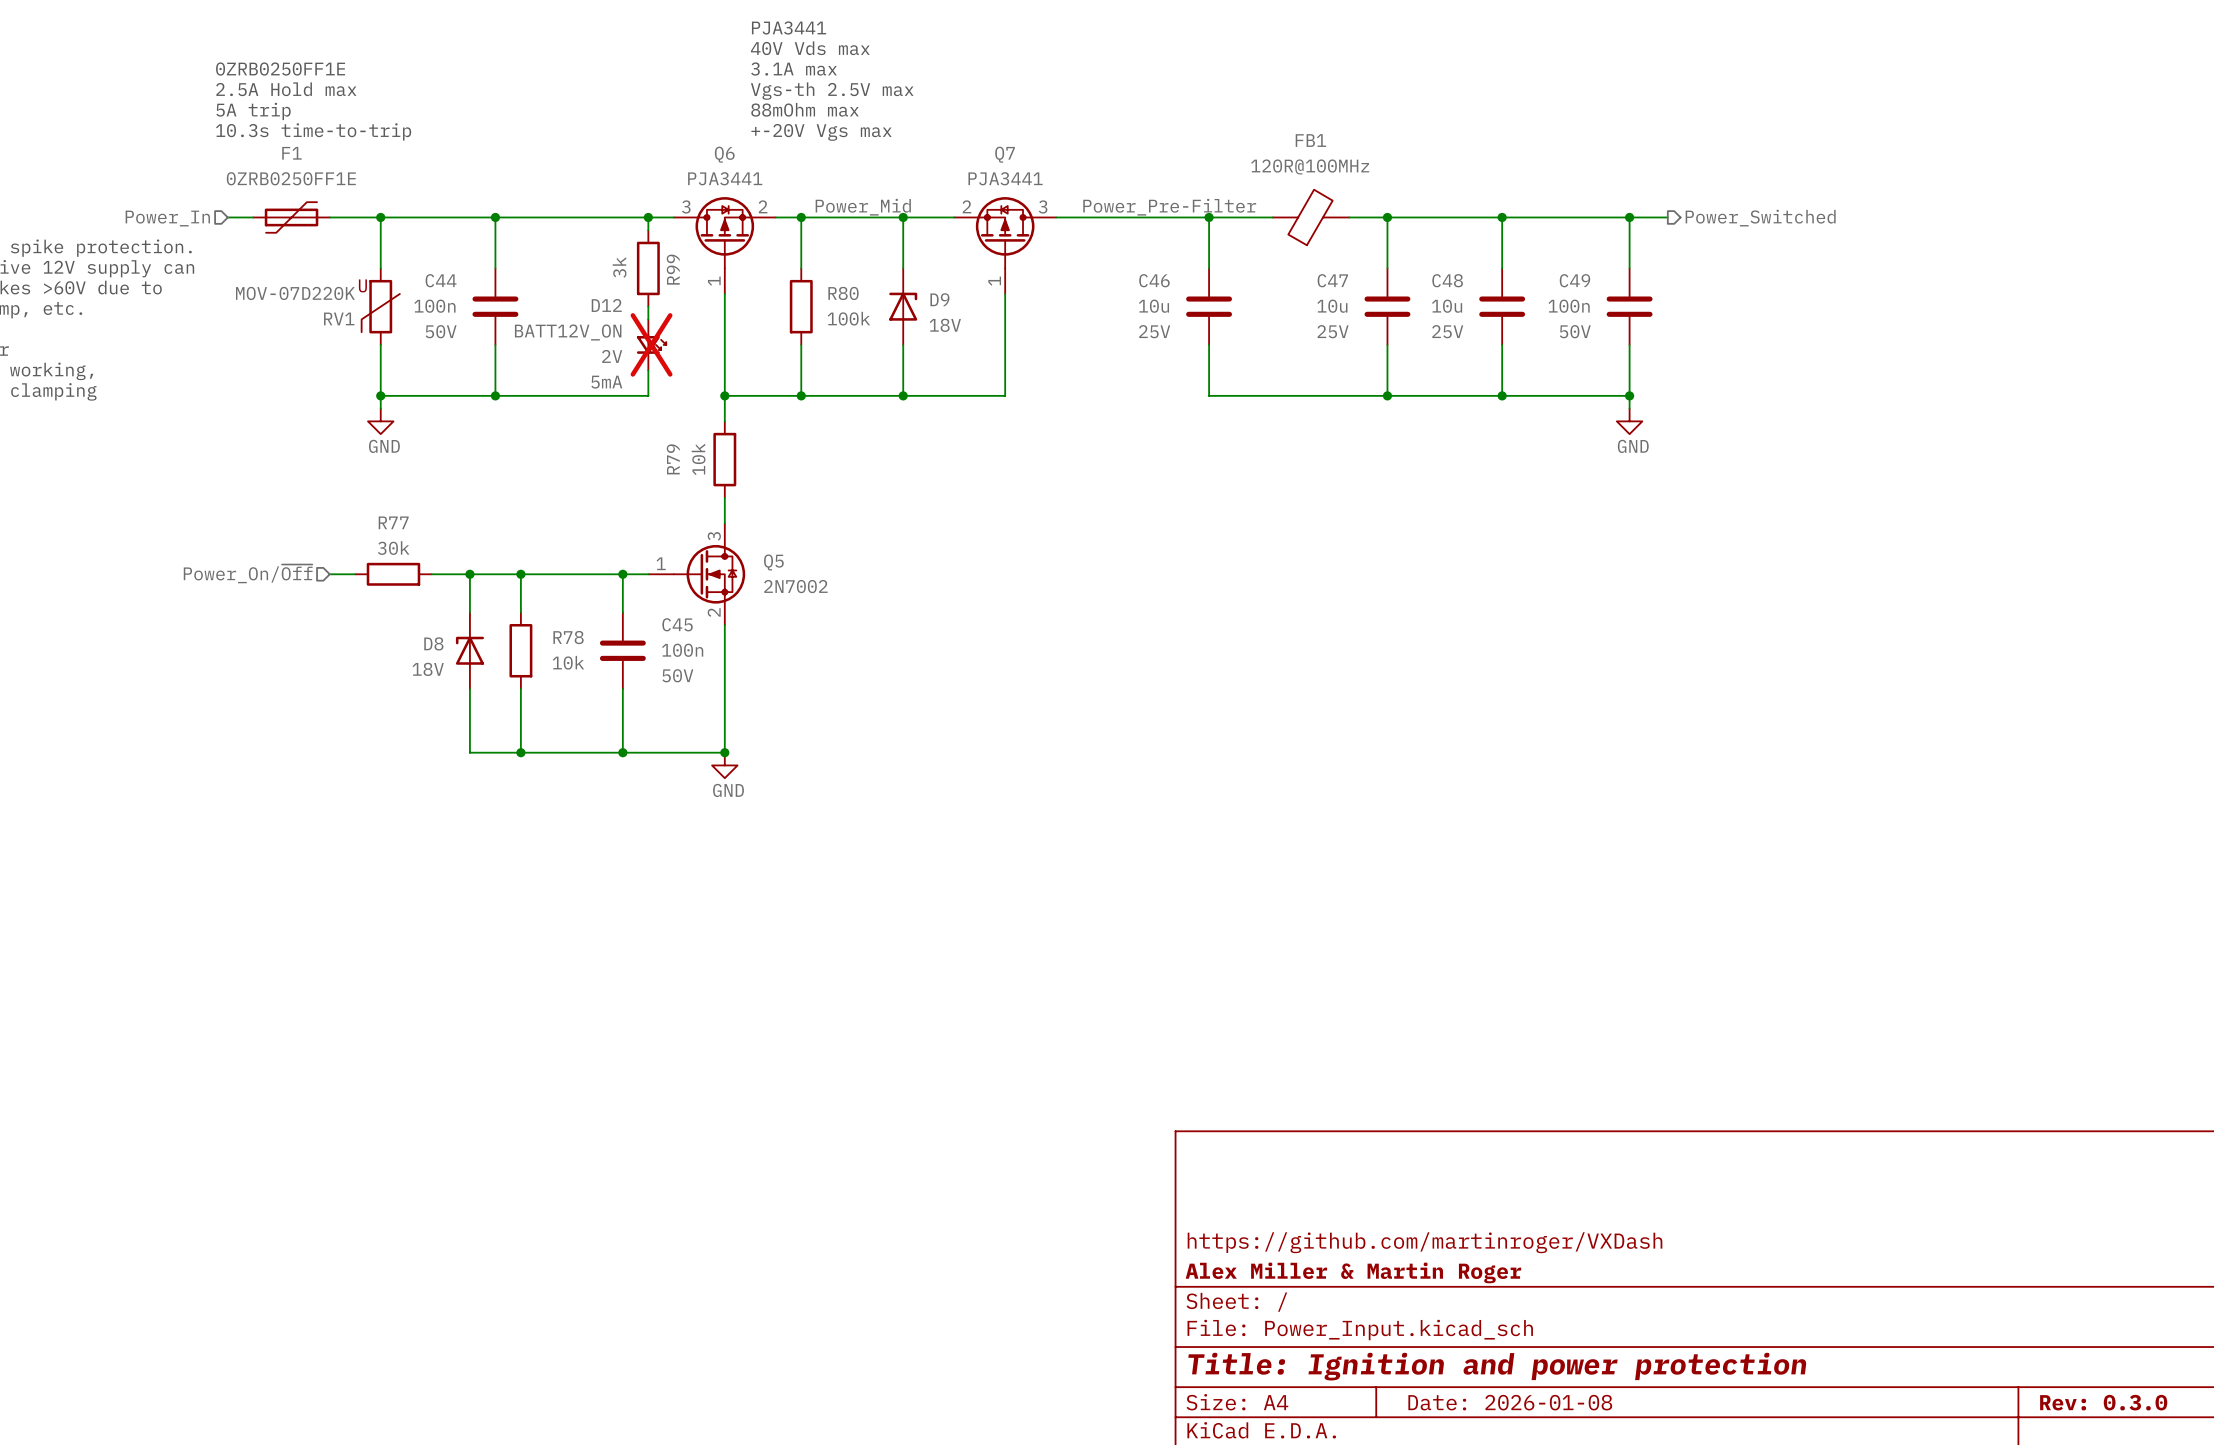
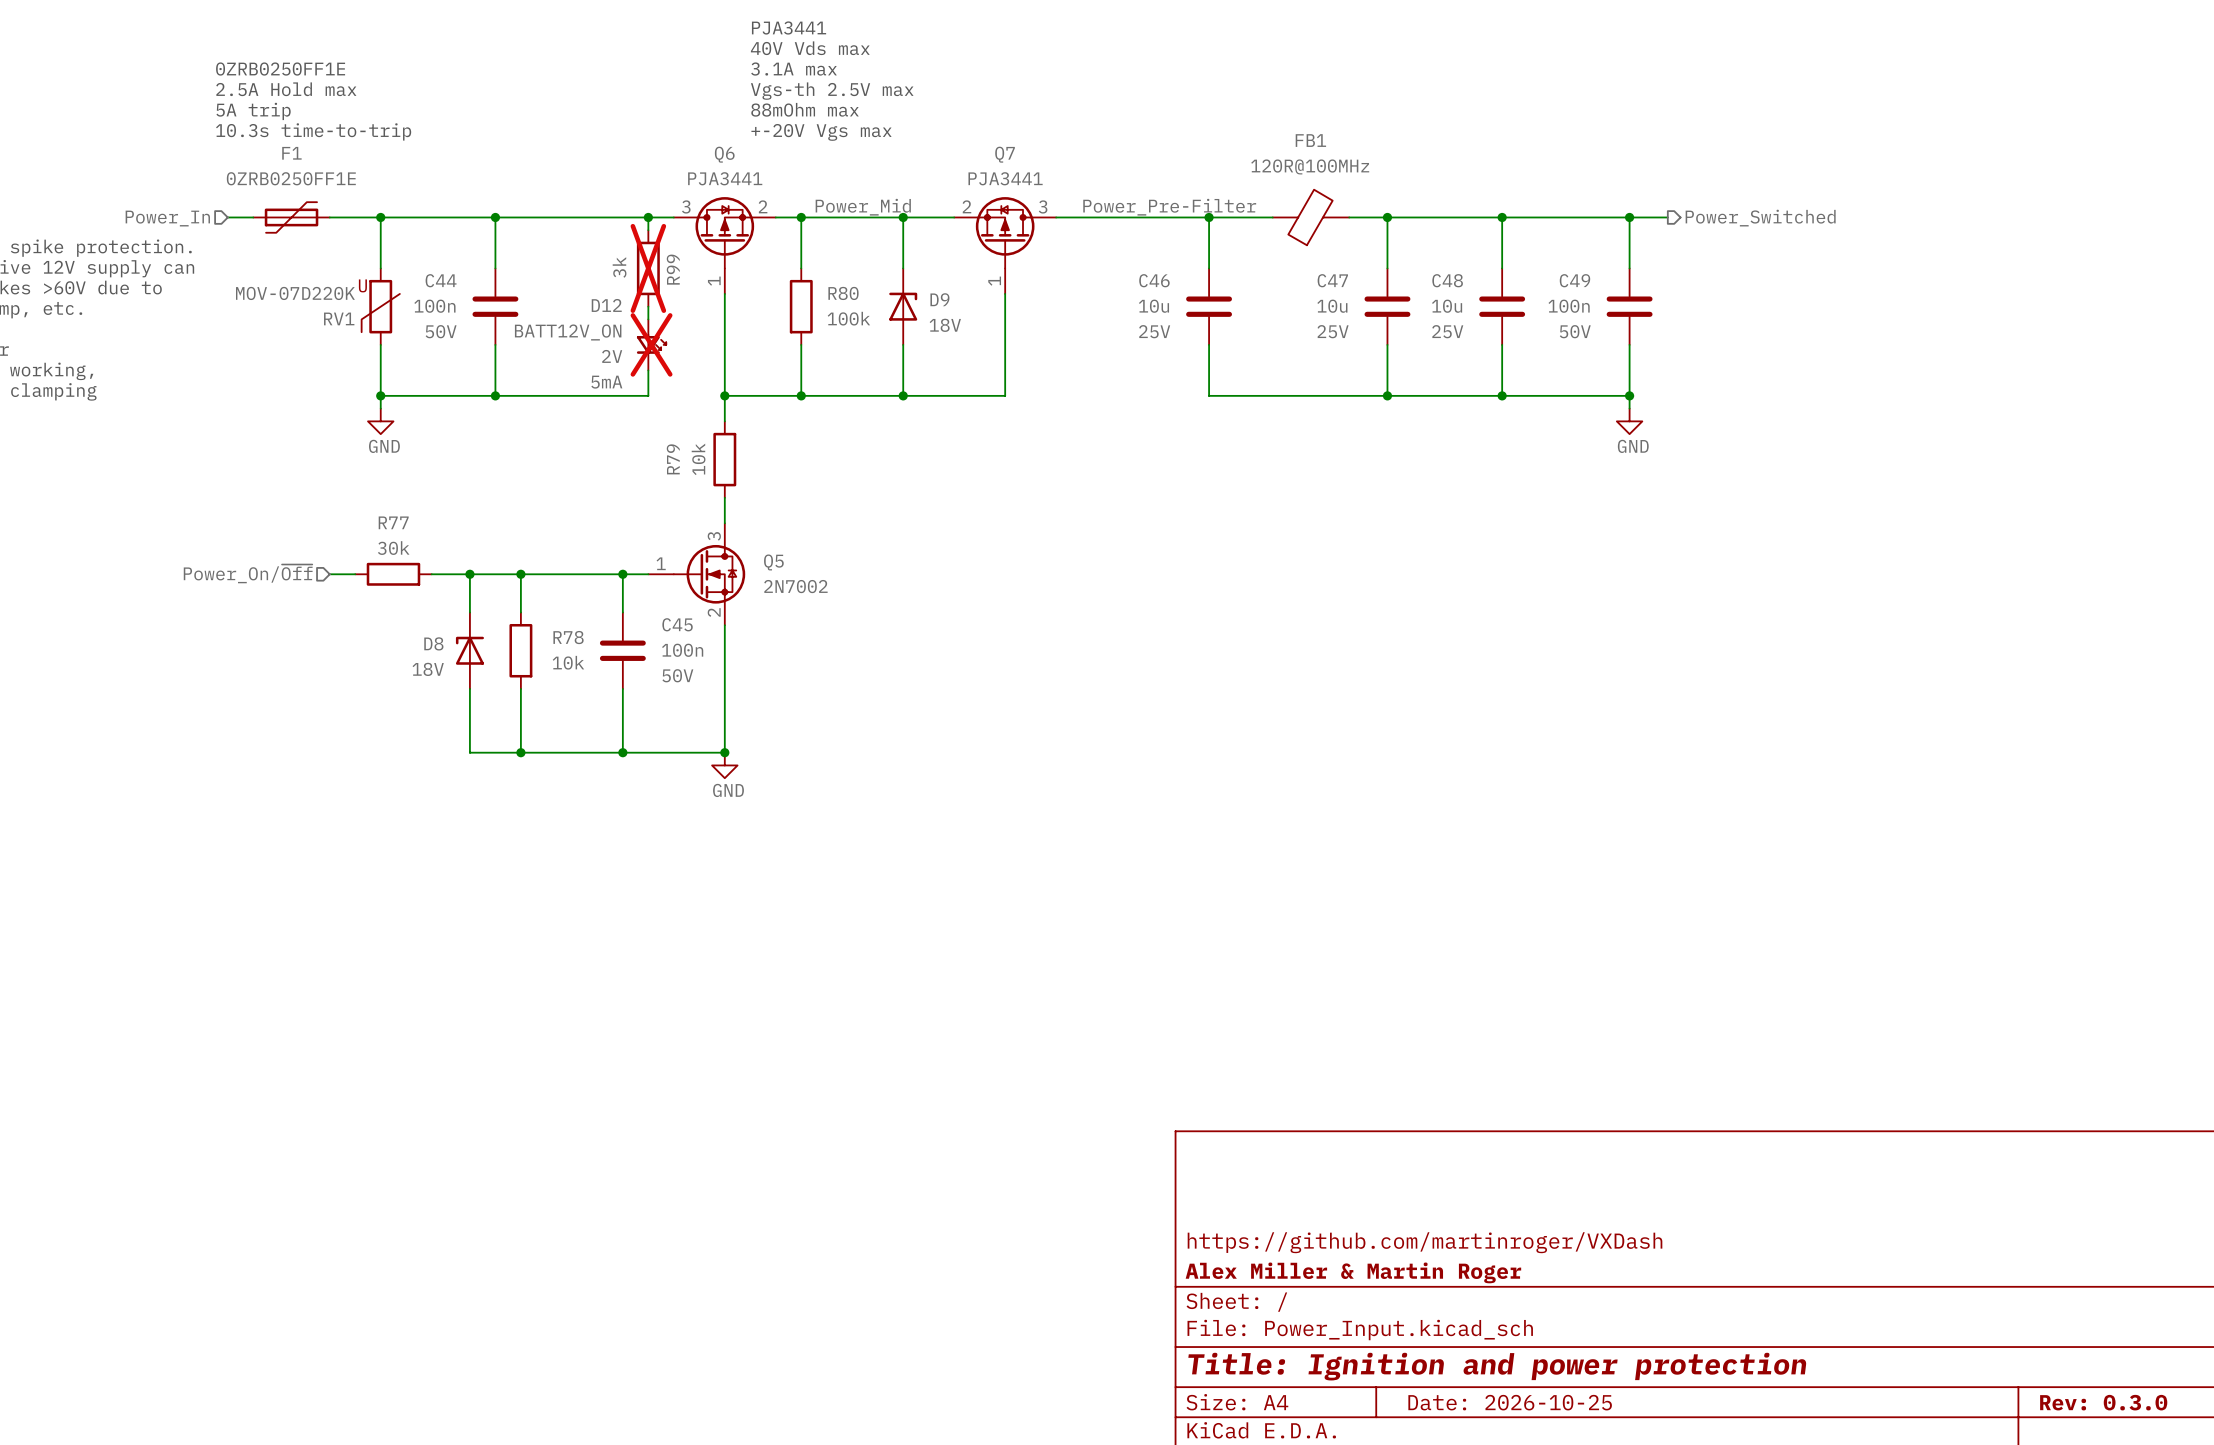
R99 do-not-place cross: none -> (648, 268)
title block: Date: 2026-01-08 (1510, 1402) -> Date: 2026-10-25 (1510, 1402)

